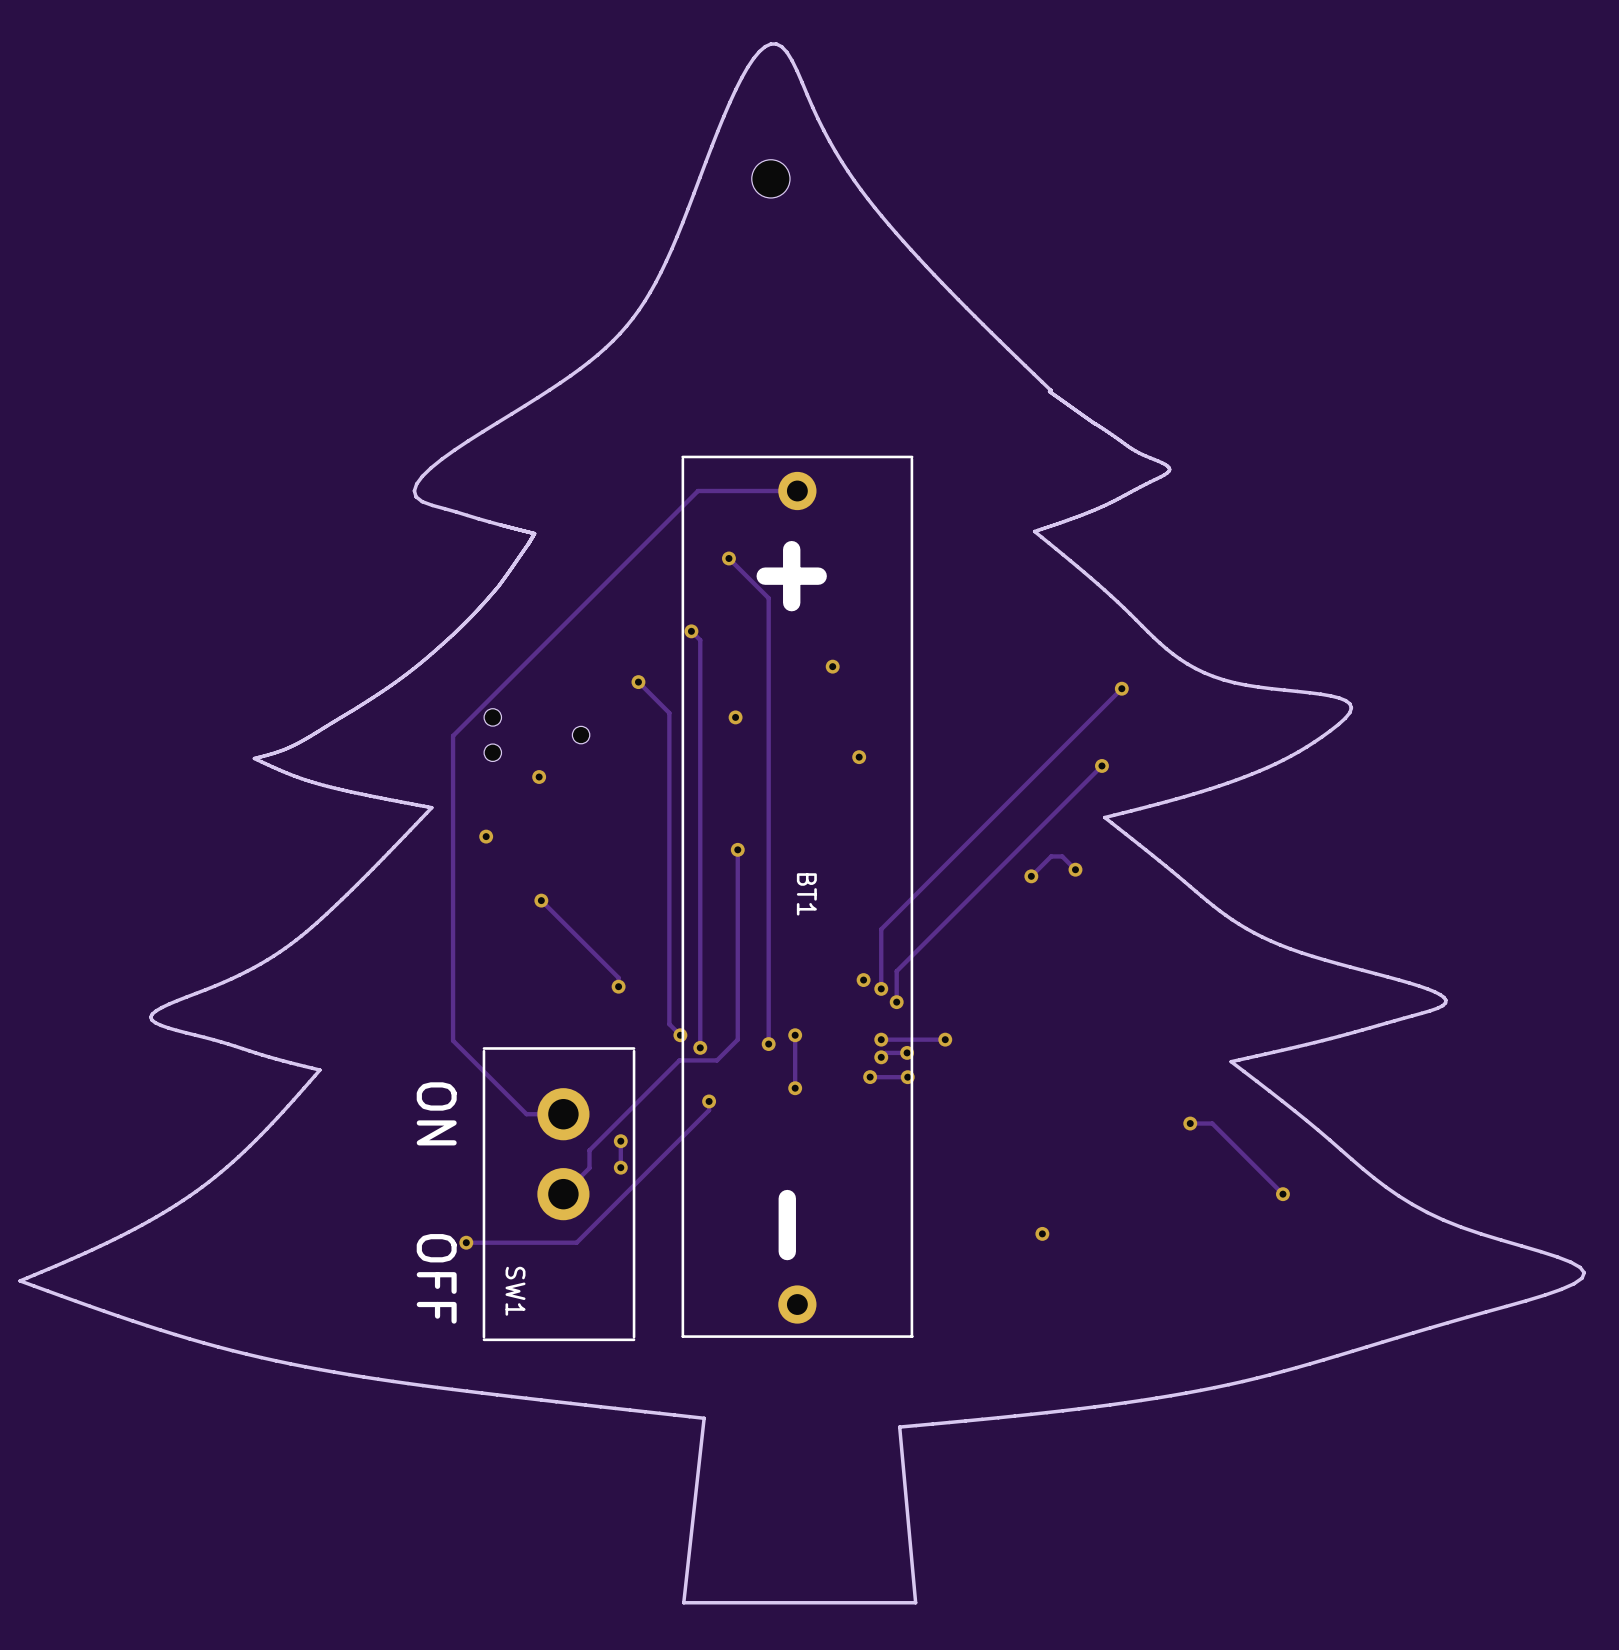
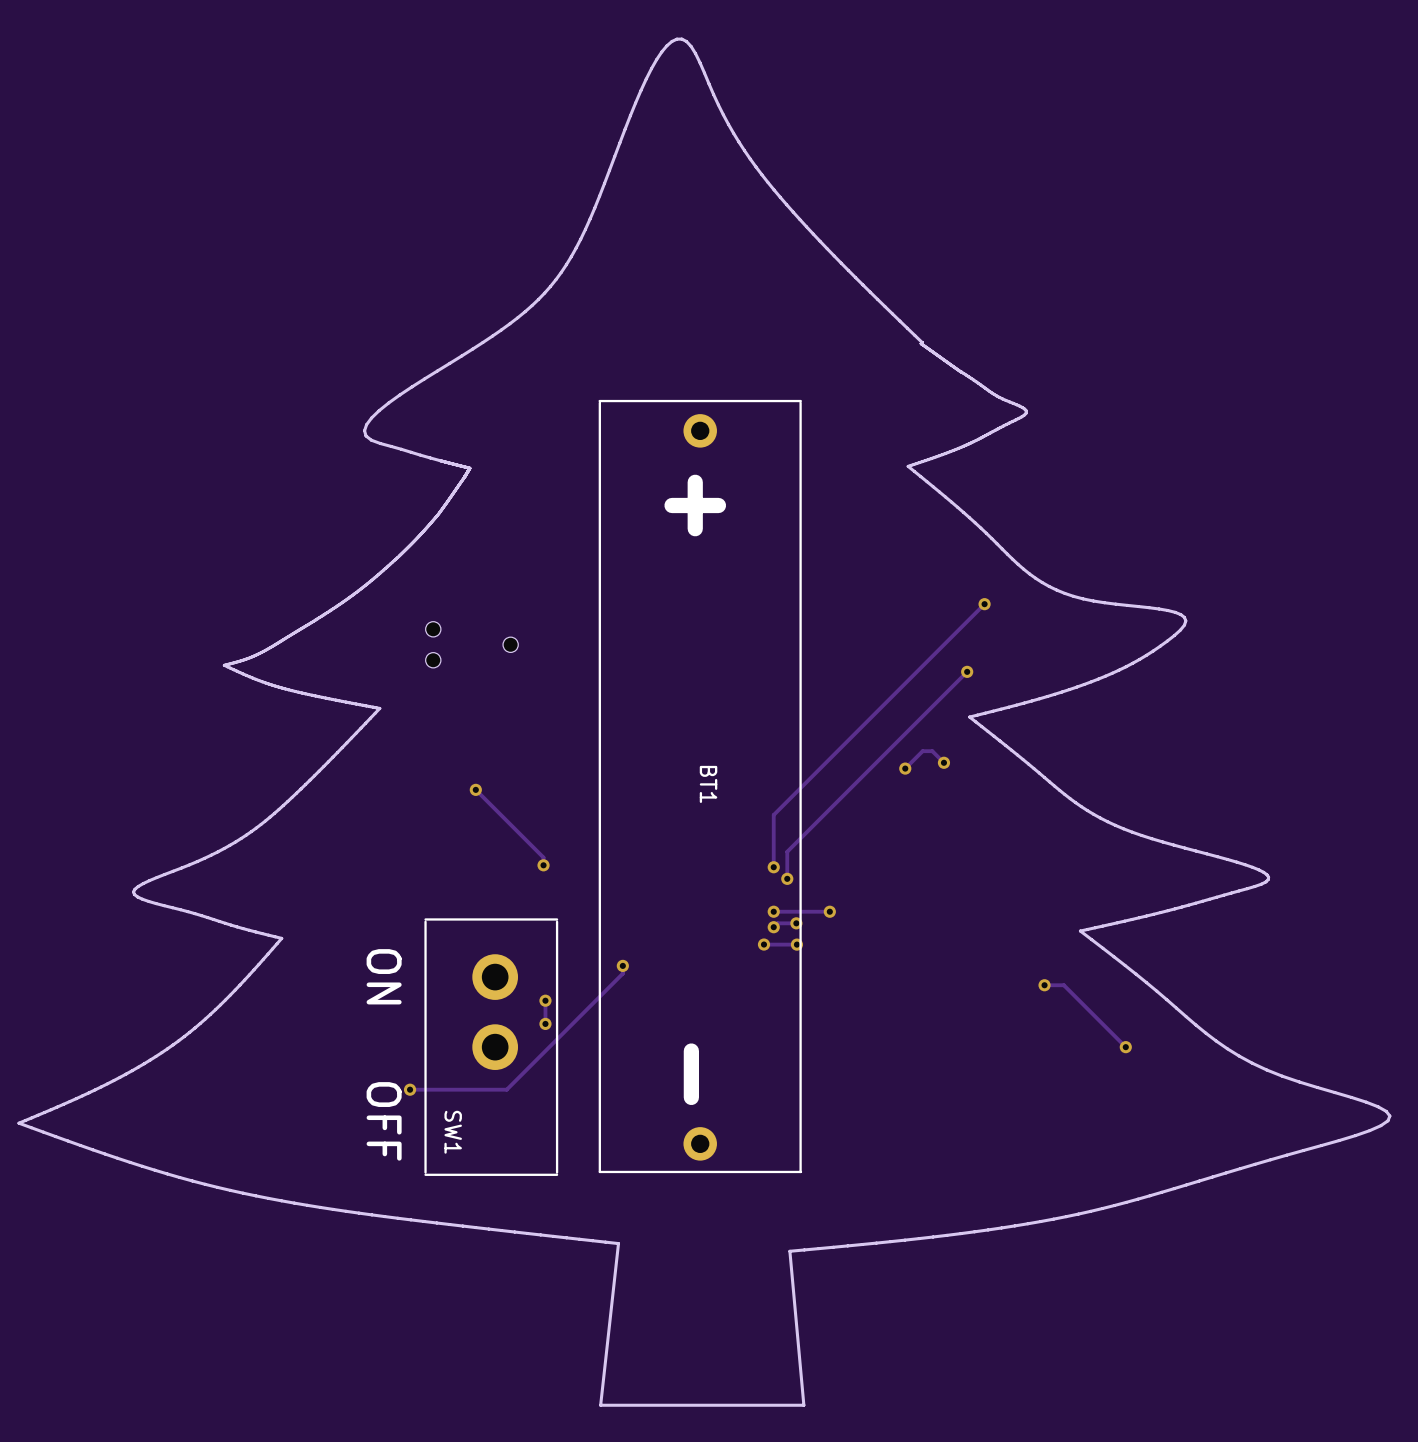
part: (770, 178) -> none
track: (797, 490) (697, 490) (453, 735) (453, 1040) (526, 1114) (563, 1114) -> none
track: (728, 558) (768, 598) (768, 1044) -> none
via: (728, 558) -> none
track: (691, 631) (700, 640) (700, 1047) -> none
via: (691, 631) -> none
via: (832, 666) -> none
track: (638, 682) (669, 713) (669, 1024) (680, 1035) -> none
via: (638, 682) -> none
via: (735, 717) -> none
via: (859, 757) -> none
via: (539, 777) -> none
via: (486, 836) -> none
track: (737, 849) (737, 1039) (717, 1060) (679, 1060) (589, 1150) (589, 1168) (563, 1194) -> none
via: (737, 849) -> none
via: (863, 980) -> none
via: (680, 1035) -> none
track: (795, 1035) (795, 1088) -> none
via: (795, 1035) -> none
via: (768, 1044) -> none
via: (700, 1047) -> none
via: (795, 1088) -> none
via: (1042, 1233) -> none

